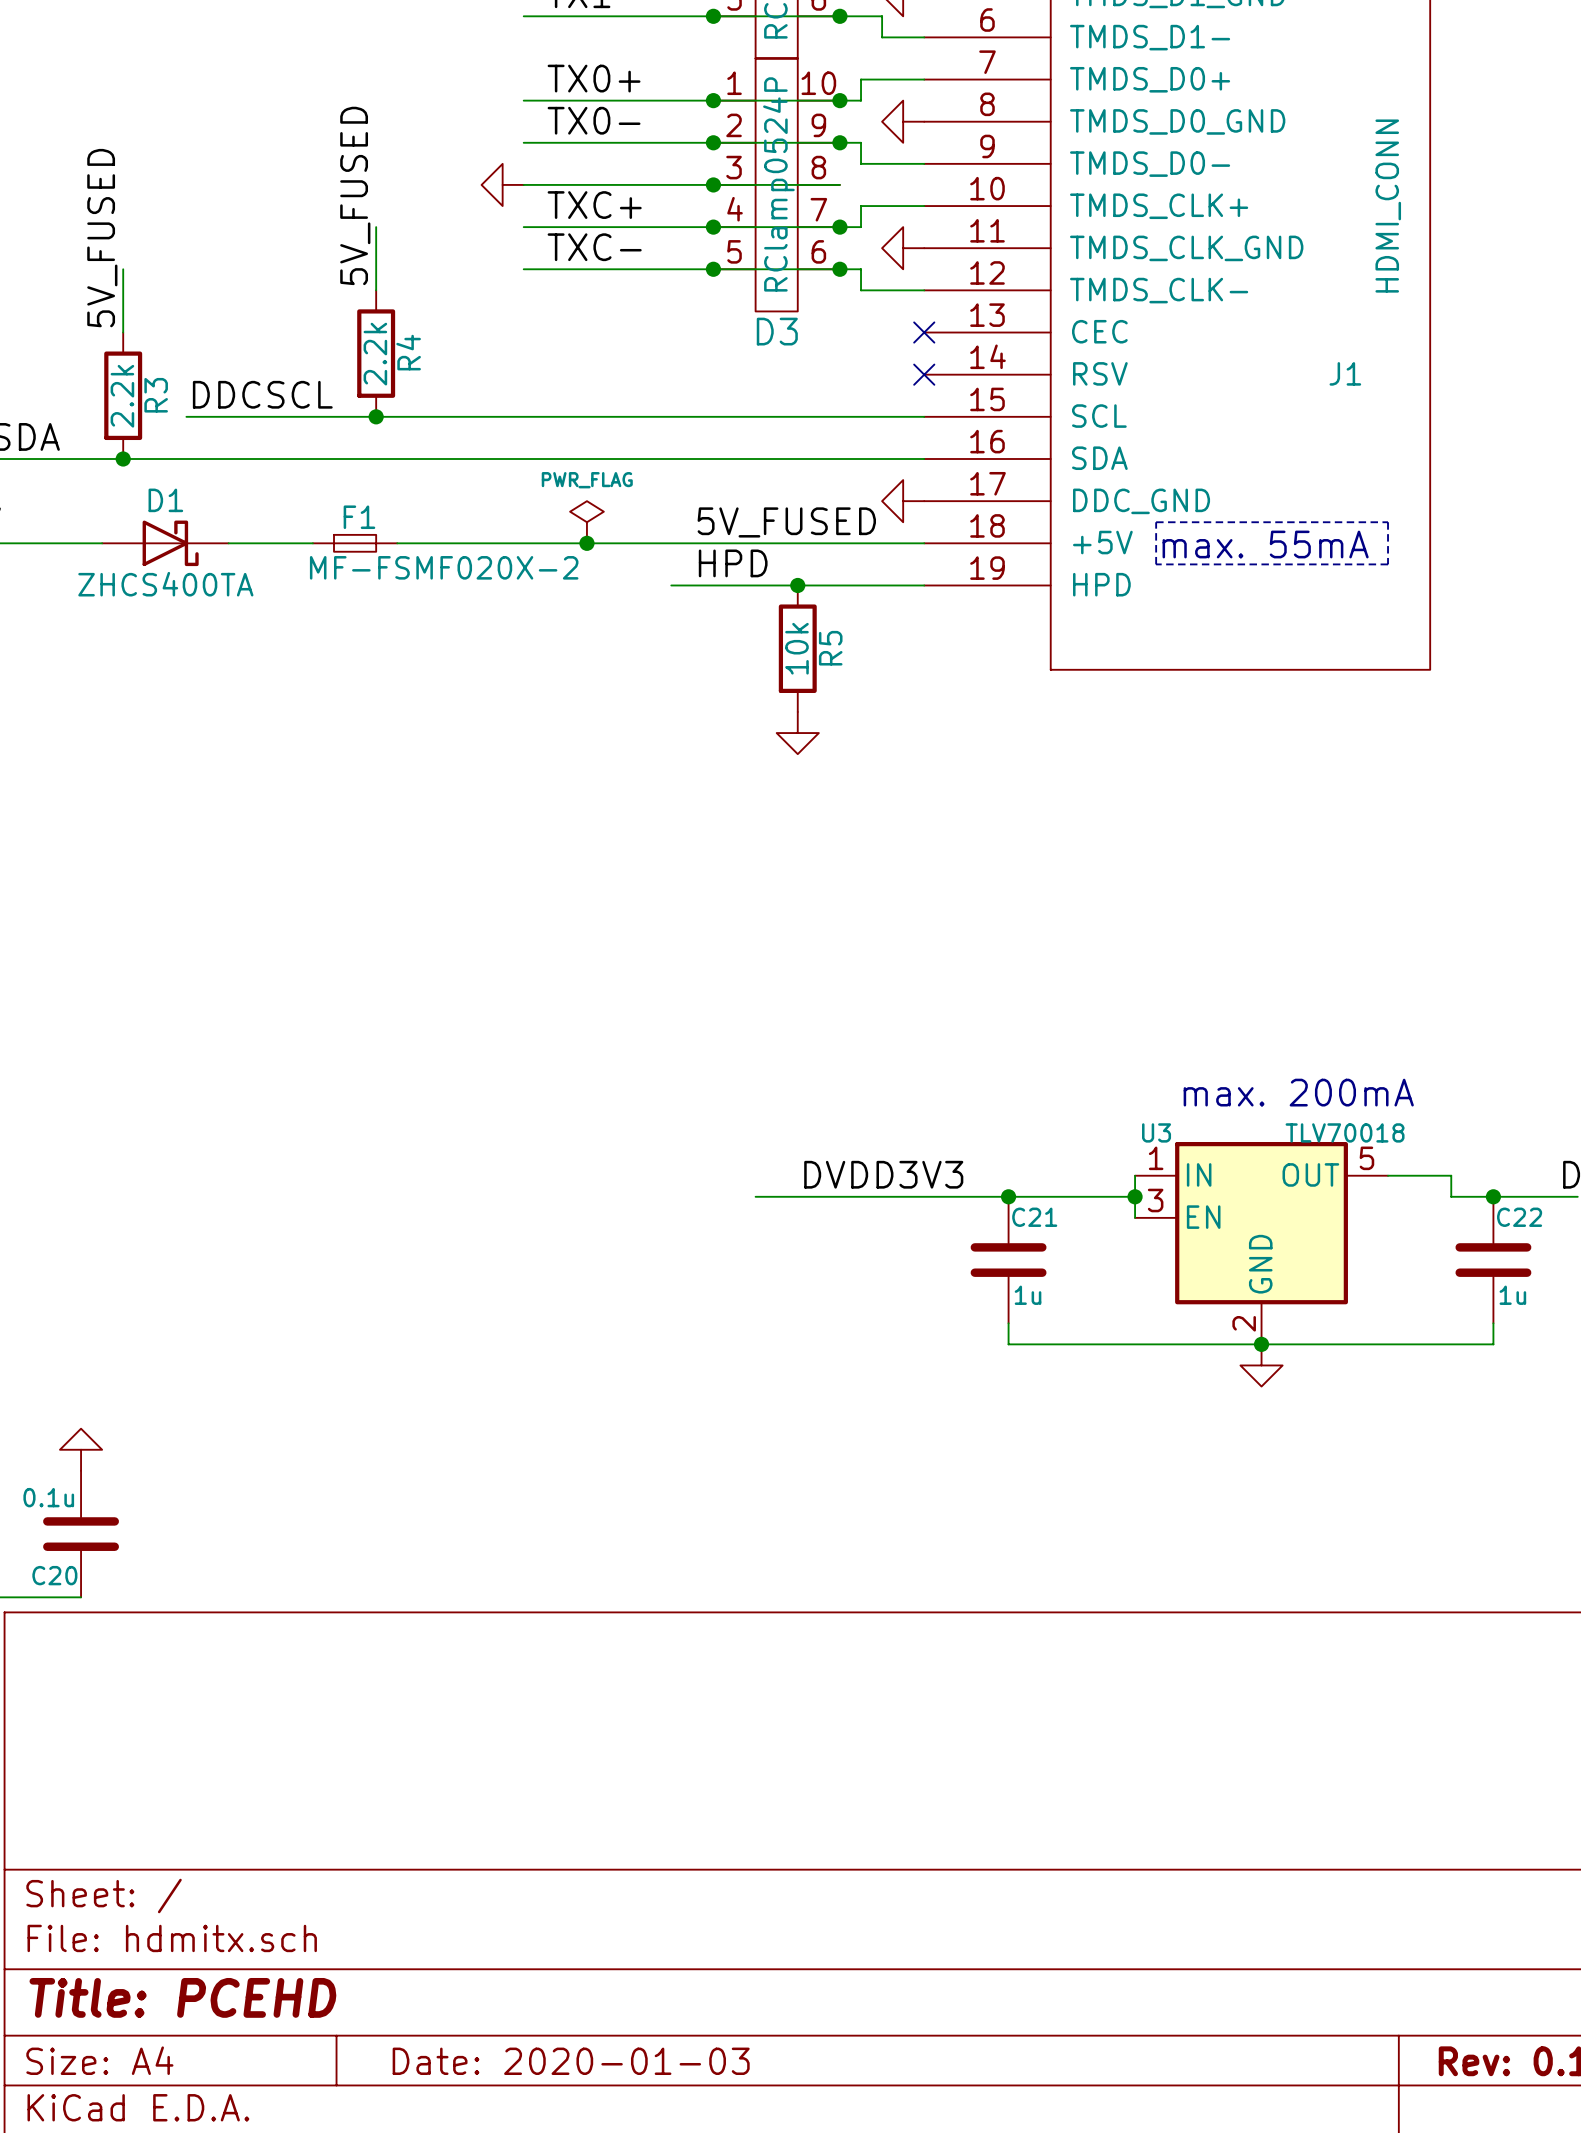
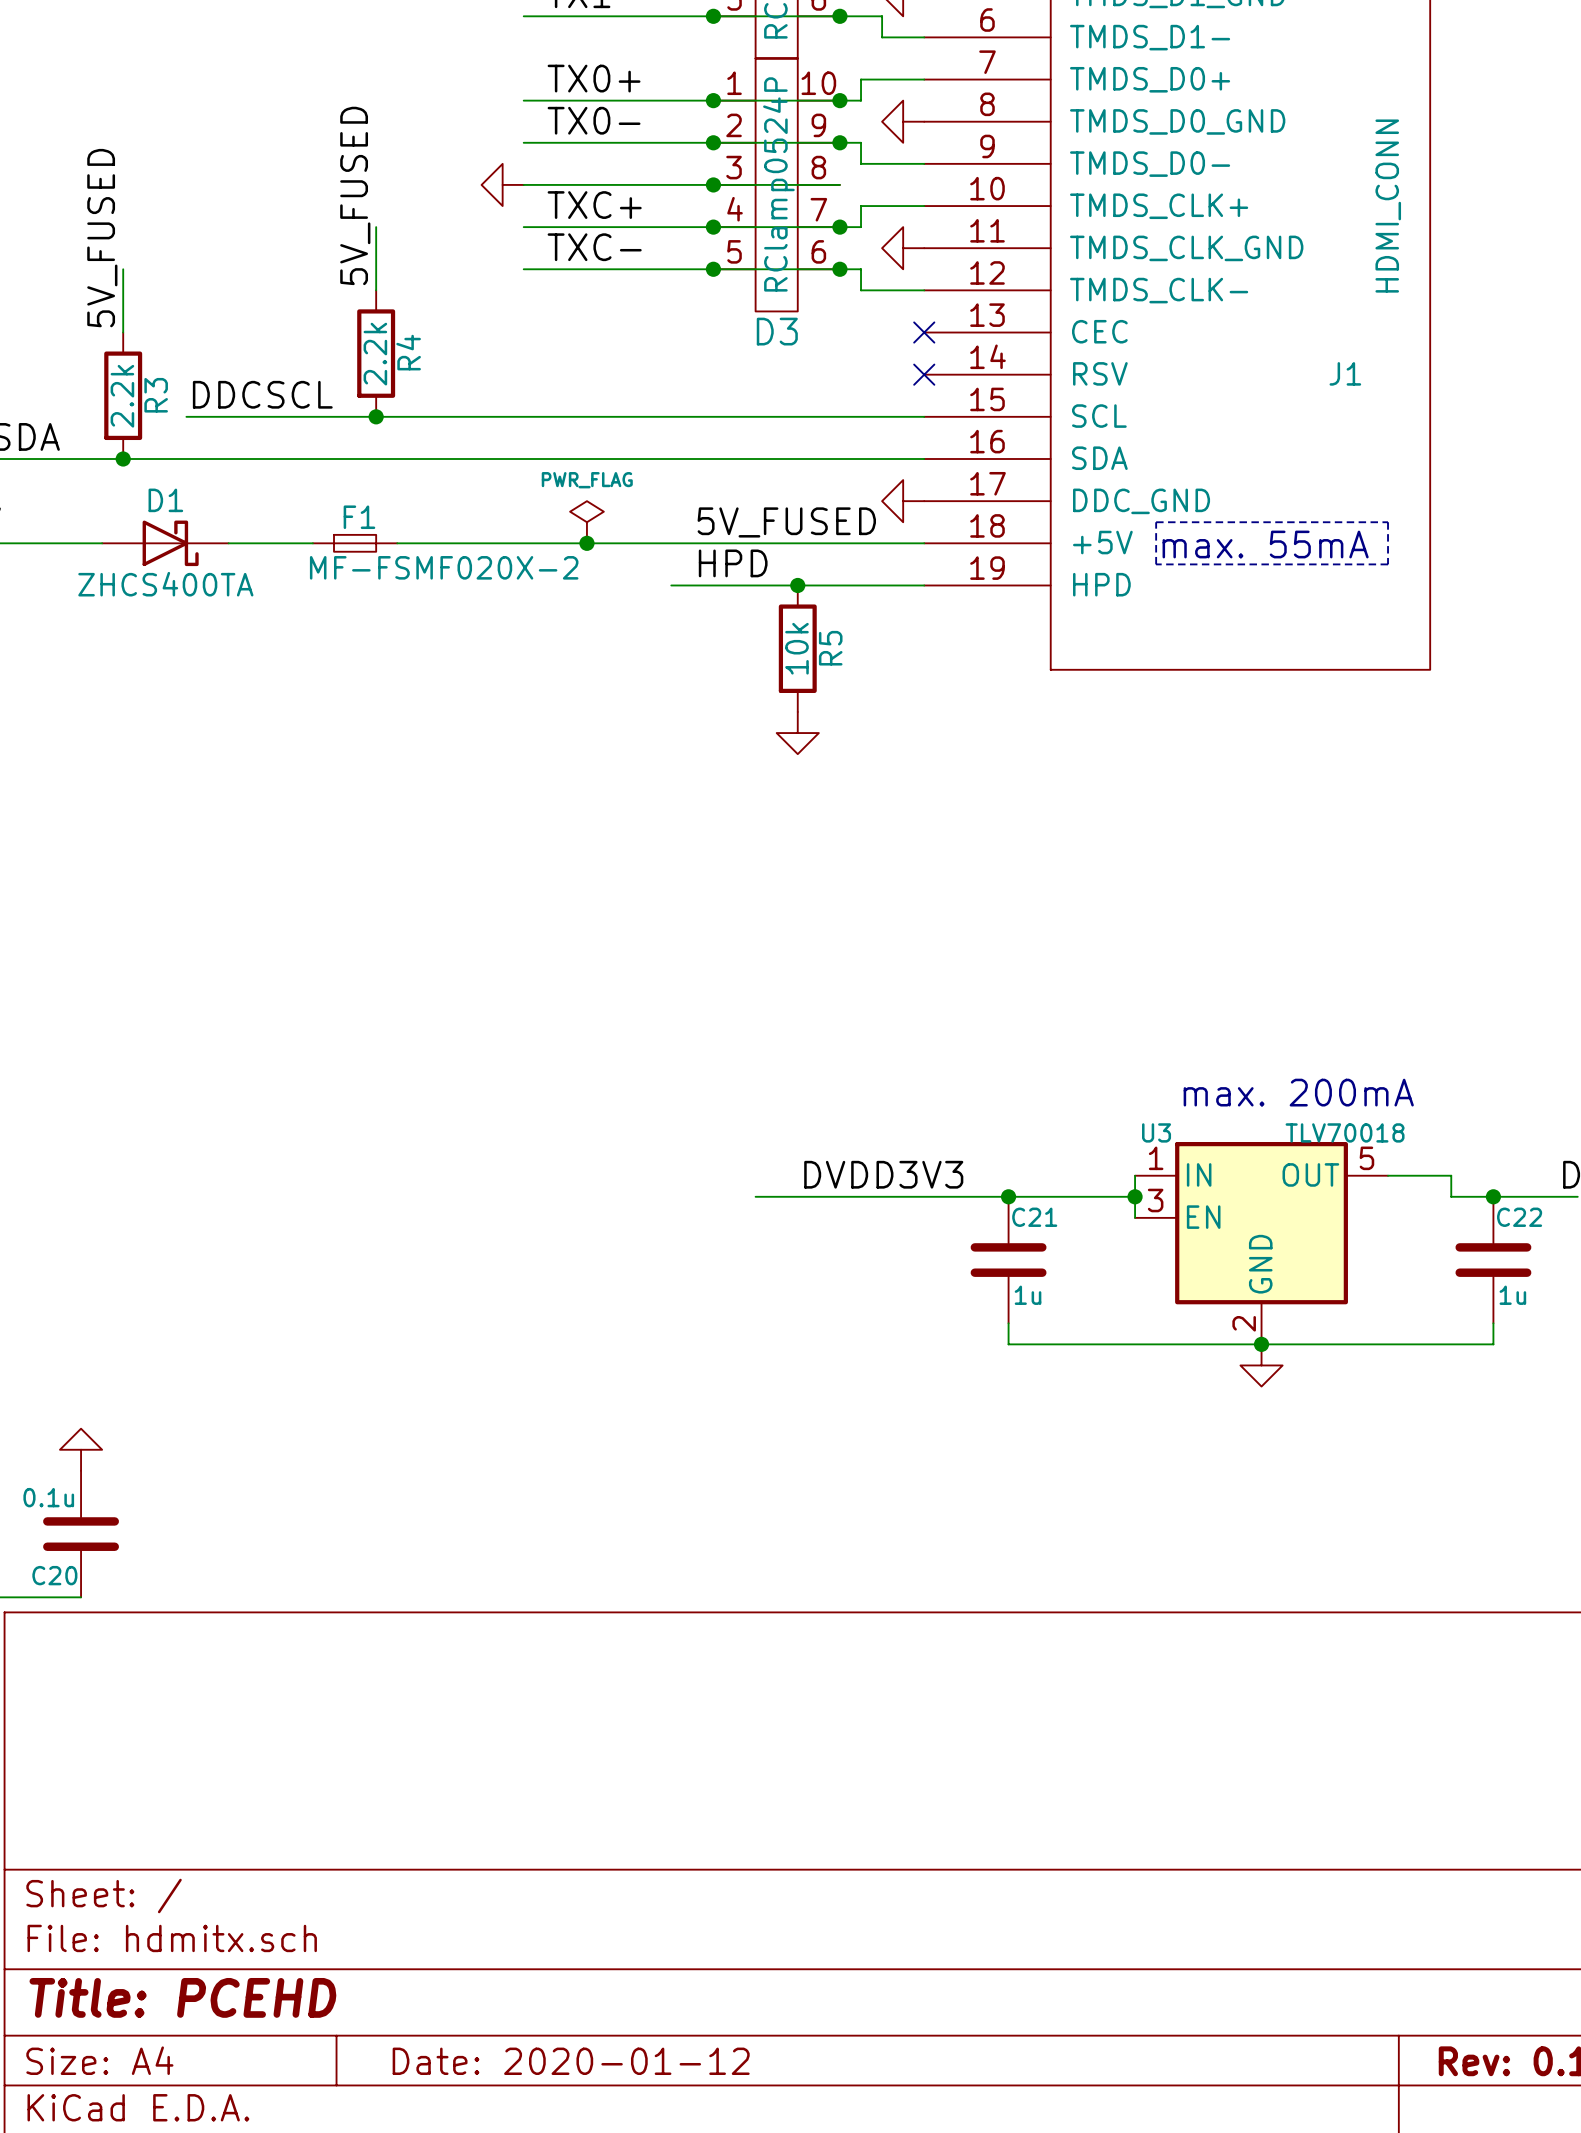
title block: Date: 2020-01-03 (571, 2061) -> Date: 2020-01-12 (571, 2061)

